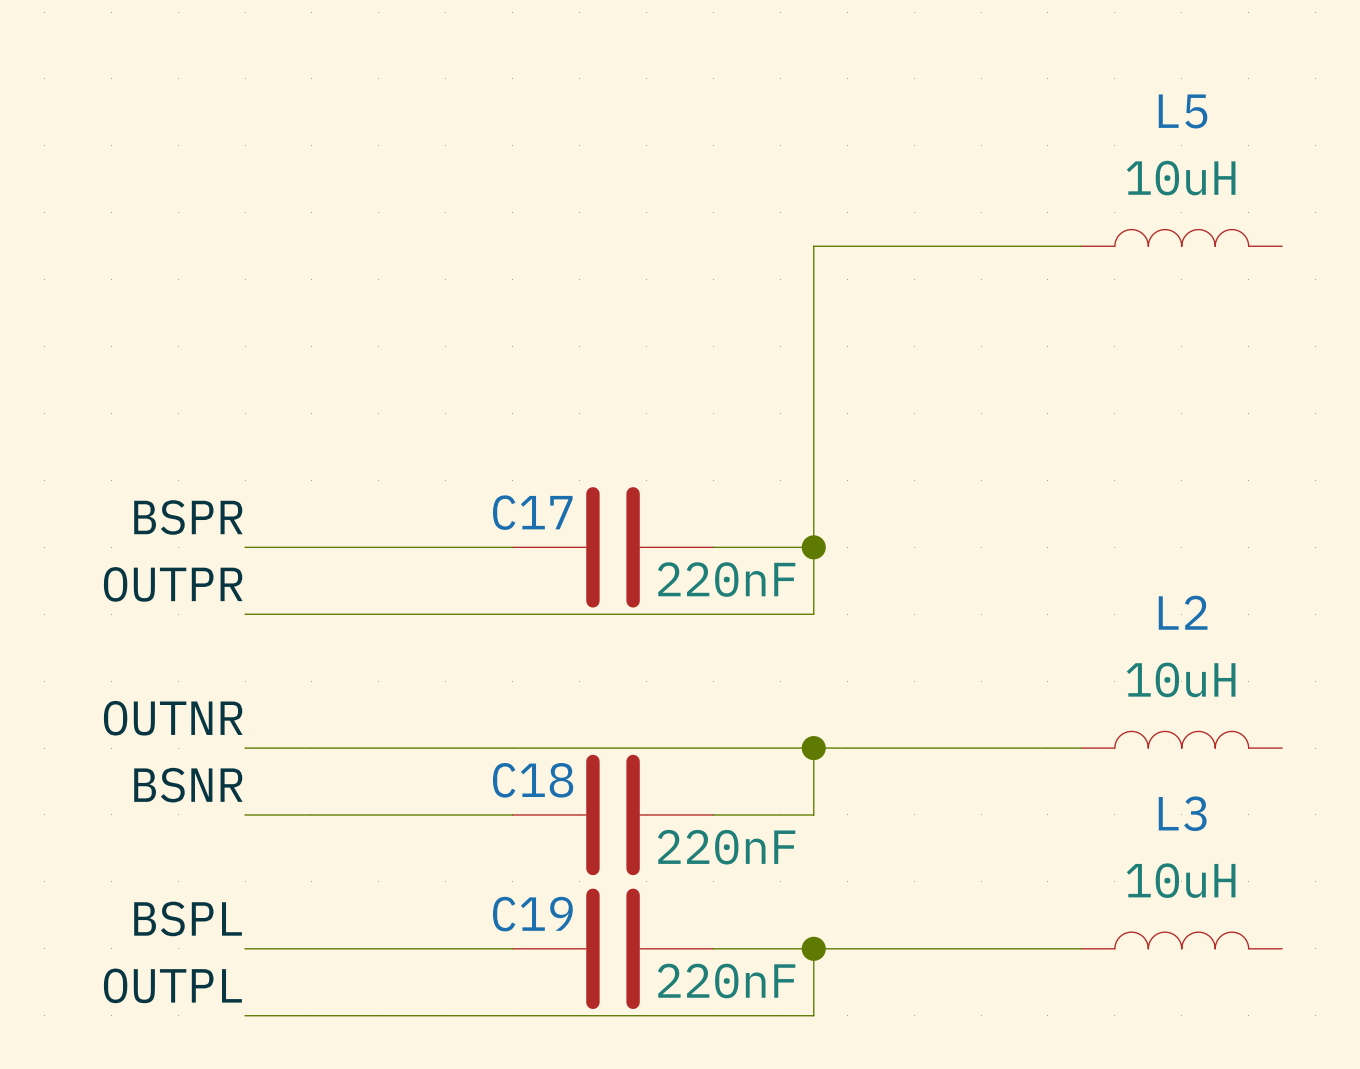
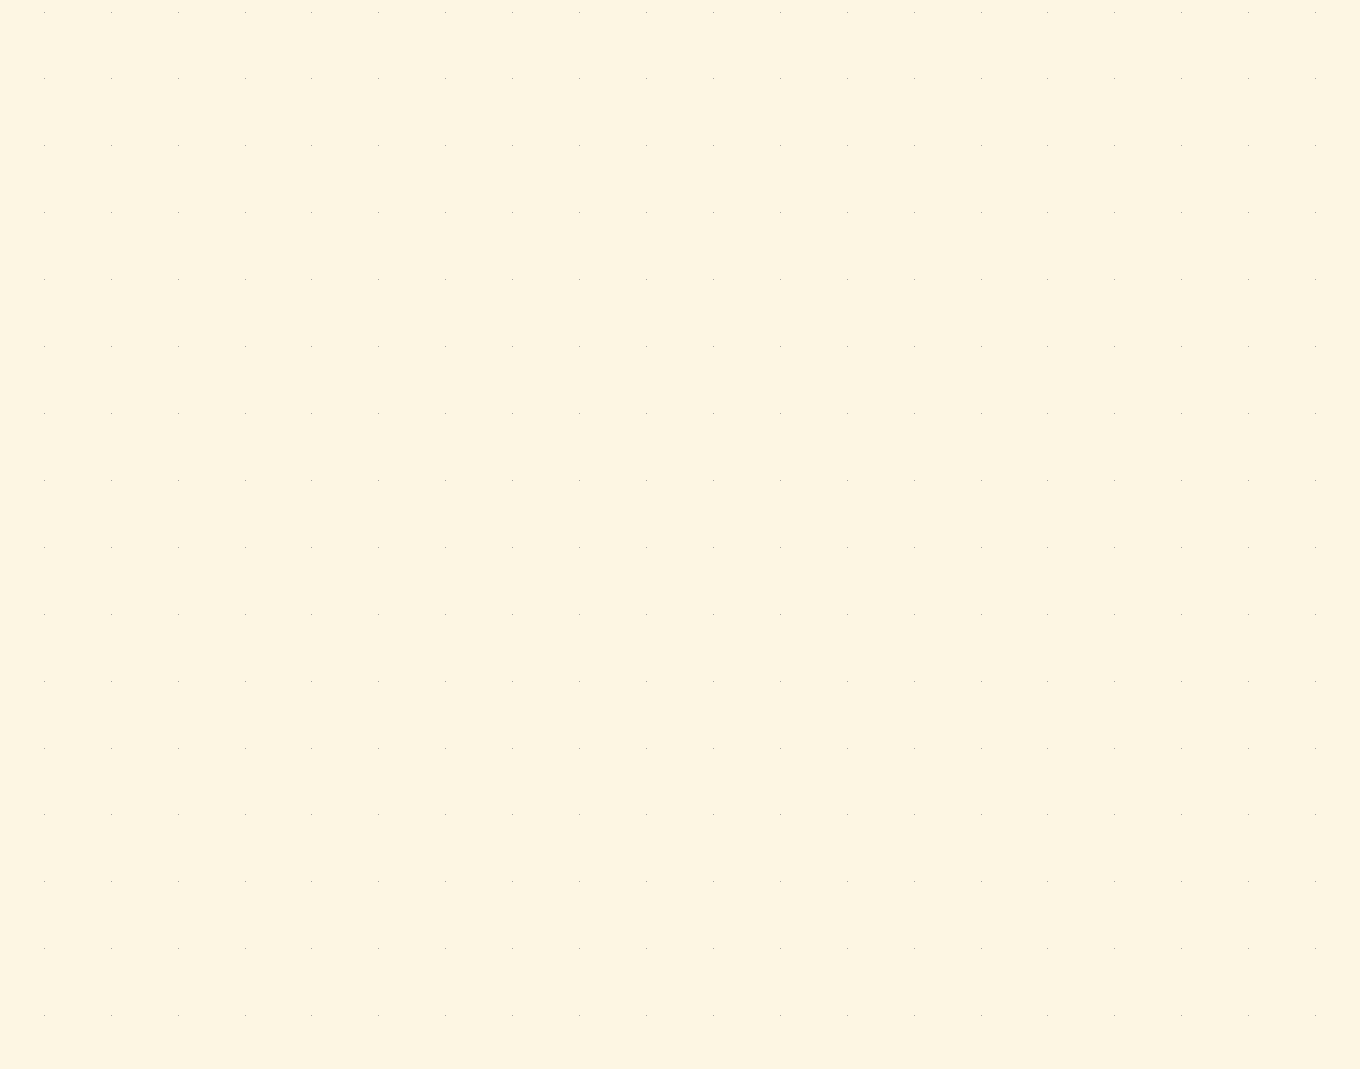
L5: 10uH (1181, 237) -> none
wire: (1081, 246) (813, 246) (813, 614) (245, 614) -> none
label: BSPR (188, 517) -> none
wire: (245, 547) (512, 547) -> none
C17: 220nF (613, 547) -> none
wire: (713, 547) (813, 547) -> none
junction: (813, 547) -> none
label: OUTPR (173, 584) -> none
label: OUTNR (173, 718) -> none
L2: 10uH (1181, 739) -> none
wire: (245, 748) (1081, 748) -> none
wire: (813, 748) (813, 814) (713, 814) -> none
junction: (813, 748) -> none
label: BSNR (188, 785) -> none
wire: (245, 814) (512, 814) -> none
C18: 220nF (613, 814) -> none
label: BSPL (188, 918) -> none
L3: 10uH (1181, 940) -> none
wire: (245, 948) (512, 948) -> none
C19: 220nF (613, 948) -> none
wire: (713, 948) (1081, 948) -> none
wire: (813, 948) (813, 1015) (245, 1015) -> none
junction: (813, 948) -> none
label: OUTPL (172, 985) -> none

